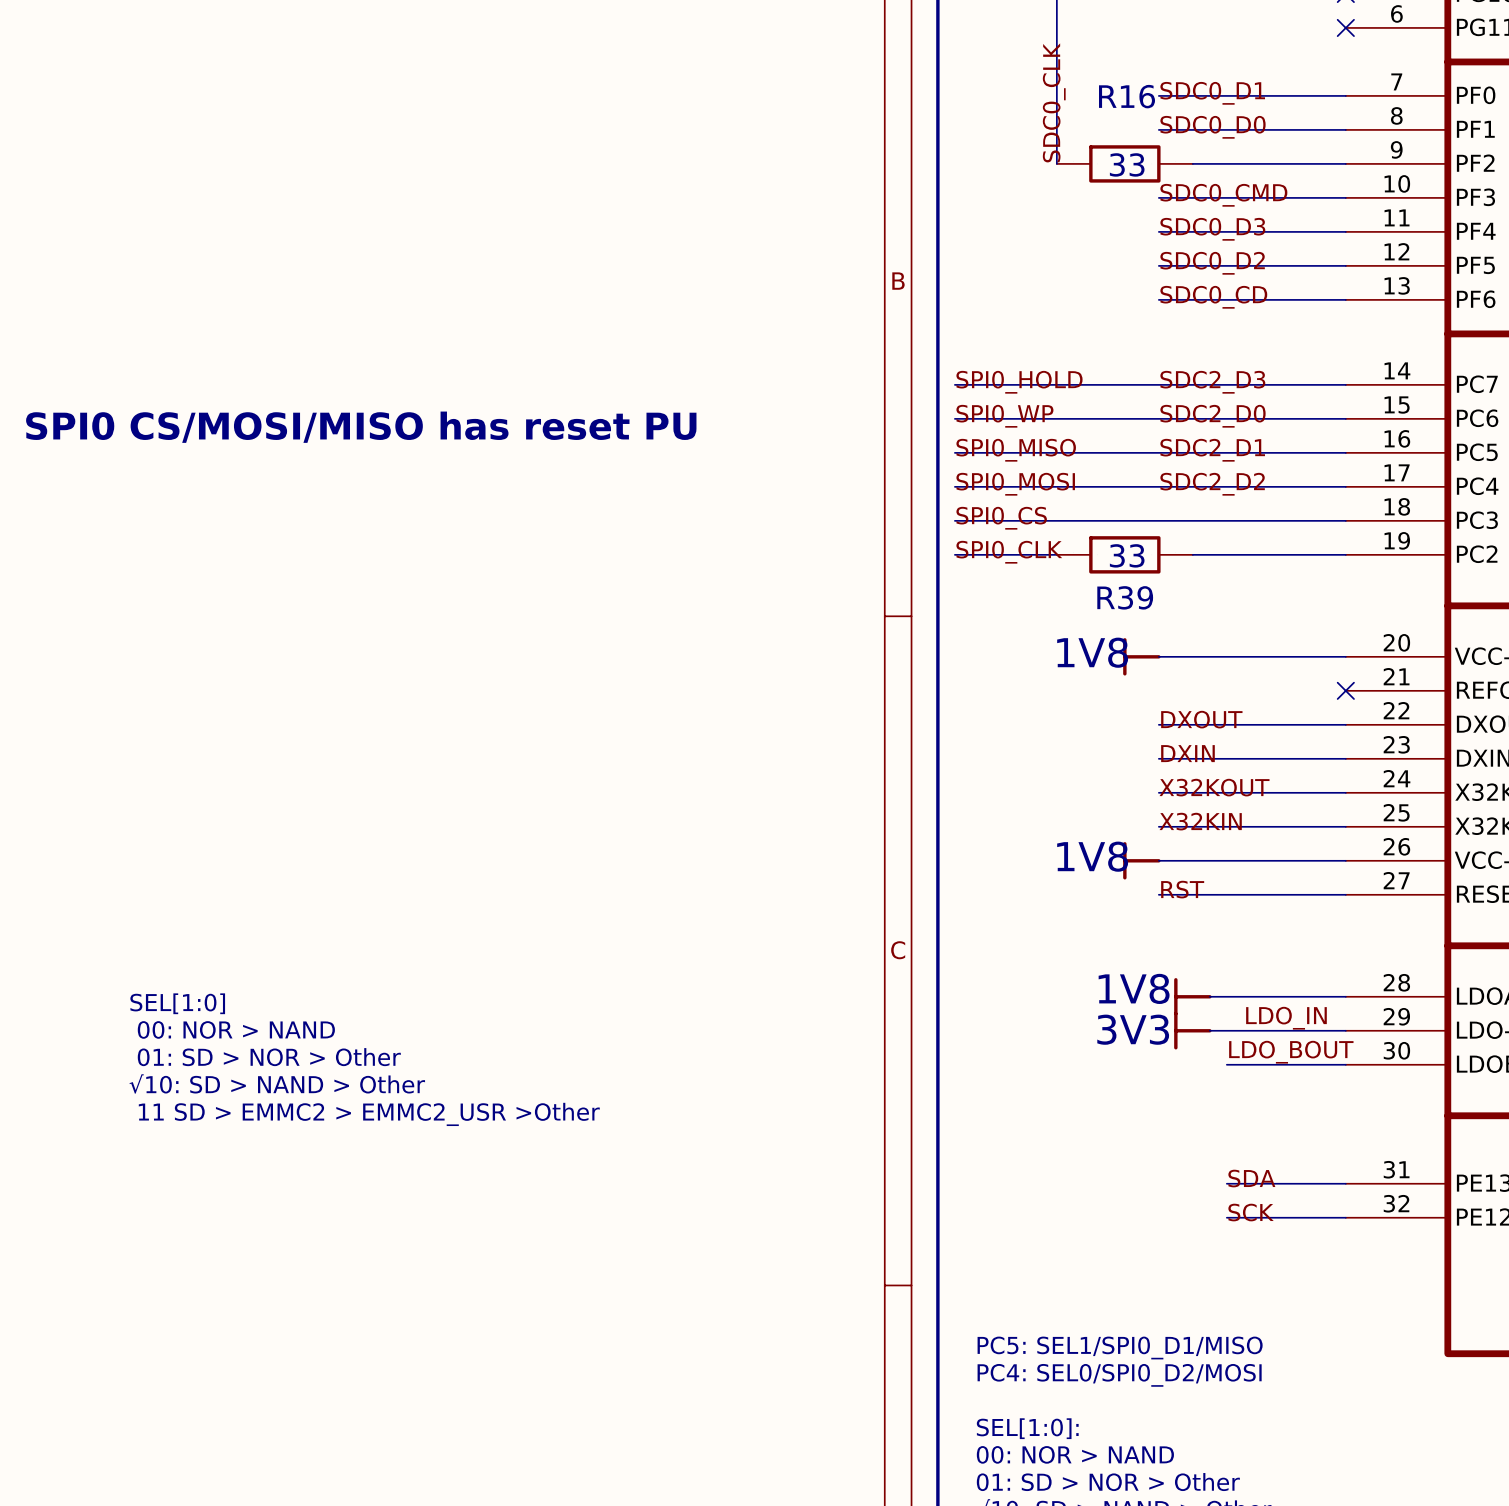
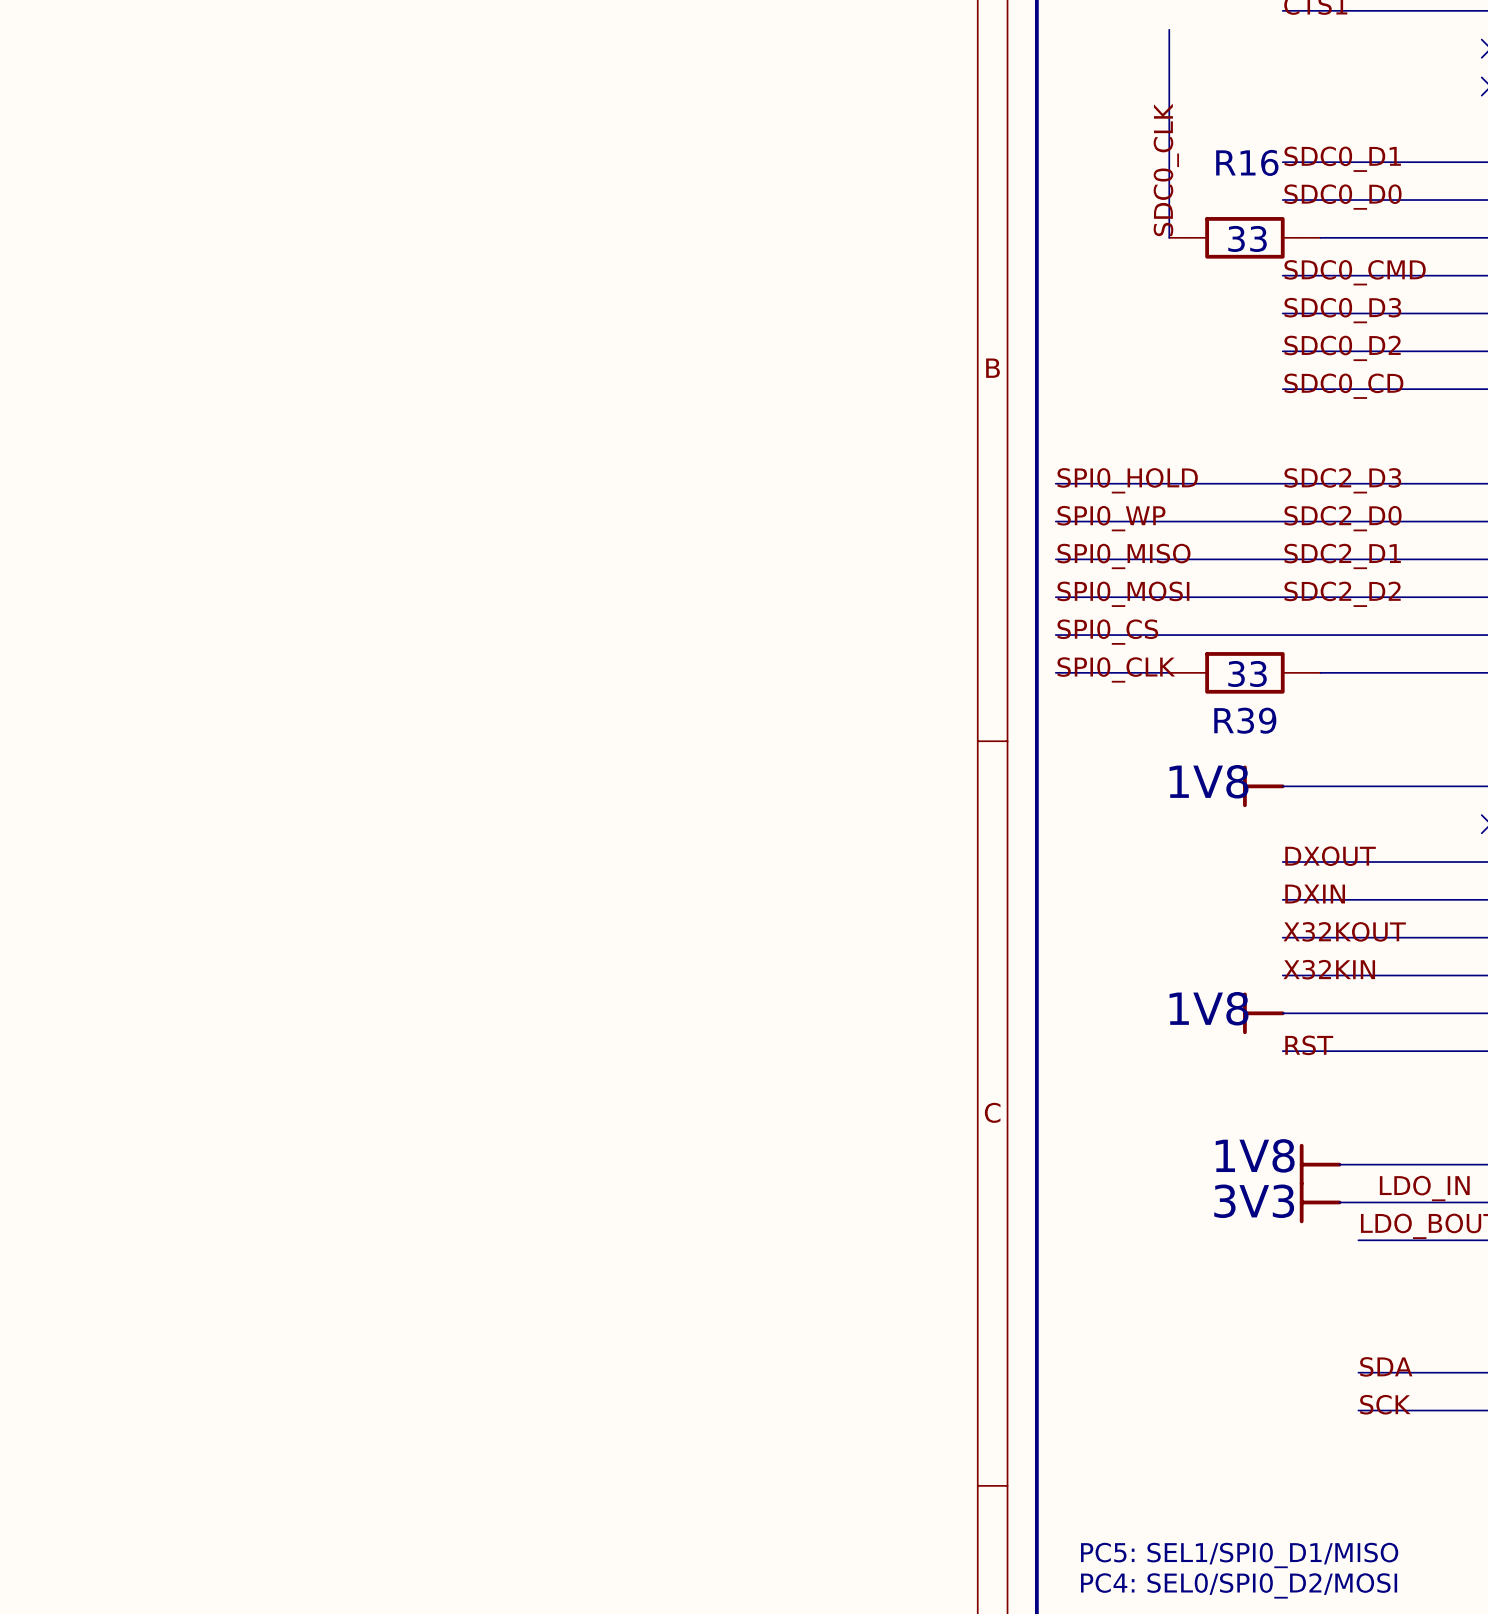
text: SPI0 CS/MOSI/MISO has reset PU (361, 427) -> none
text: SEL[1:0] (177, 1003) -> none
text: 00: NOR > NAND (236, 1029) -> none
text: 01: SD > NOR > Other (269, 1057) -> none
text: √10: SD > NAND > Other (277, 1083) -> none
text: 11 SD > EMMC2 > EMMC2_USR >Other (369, 1114) -> none

